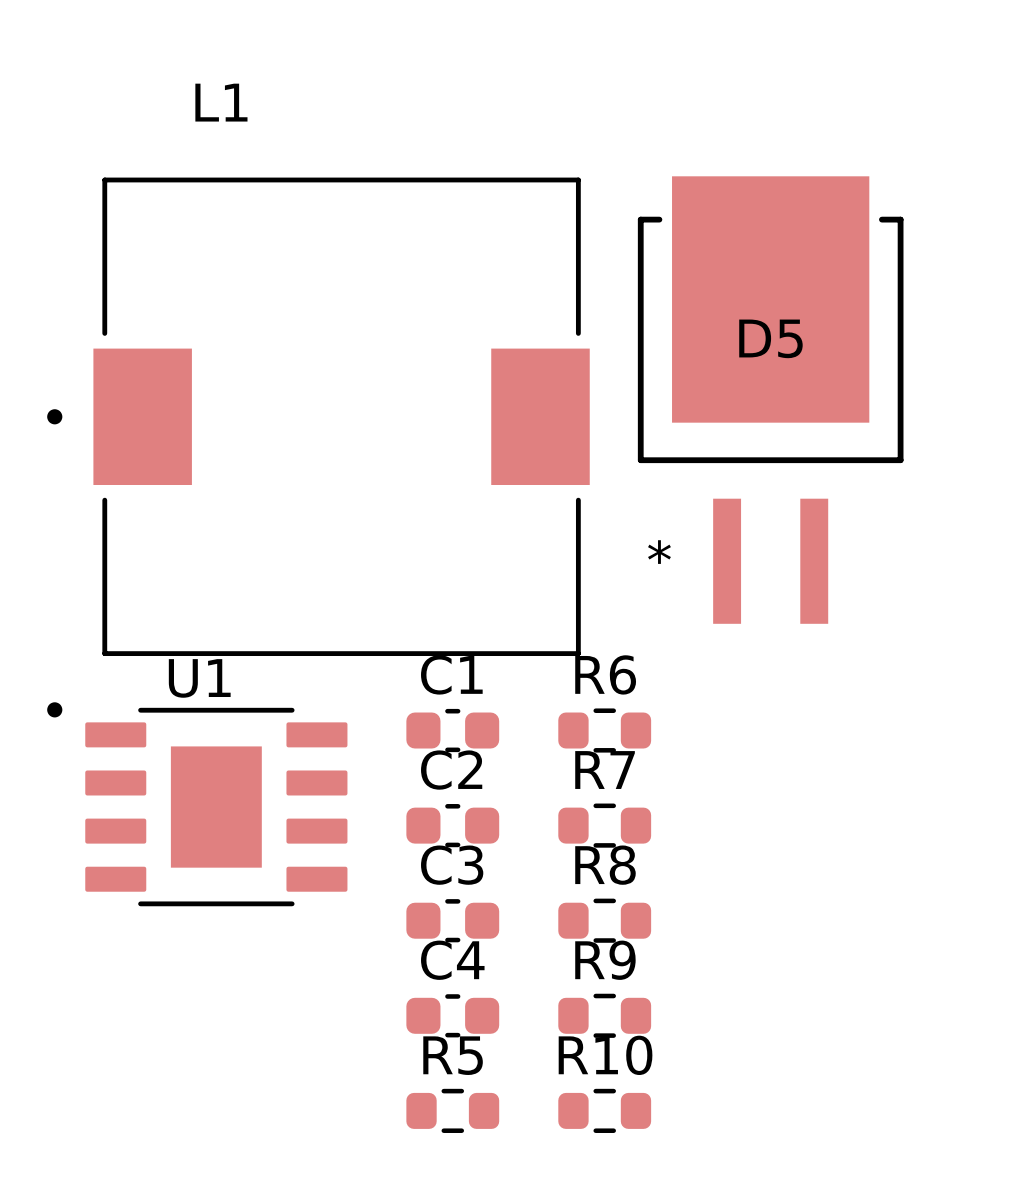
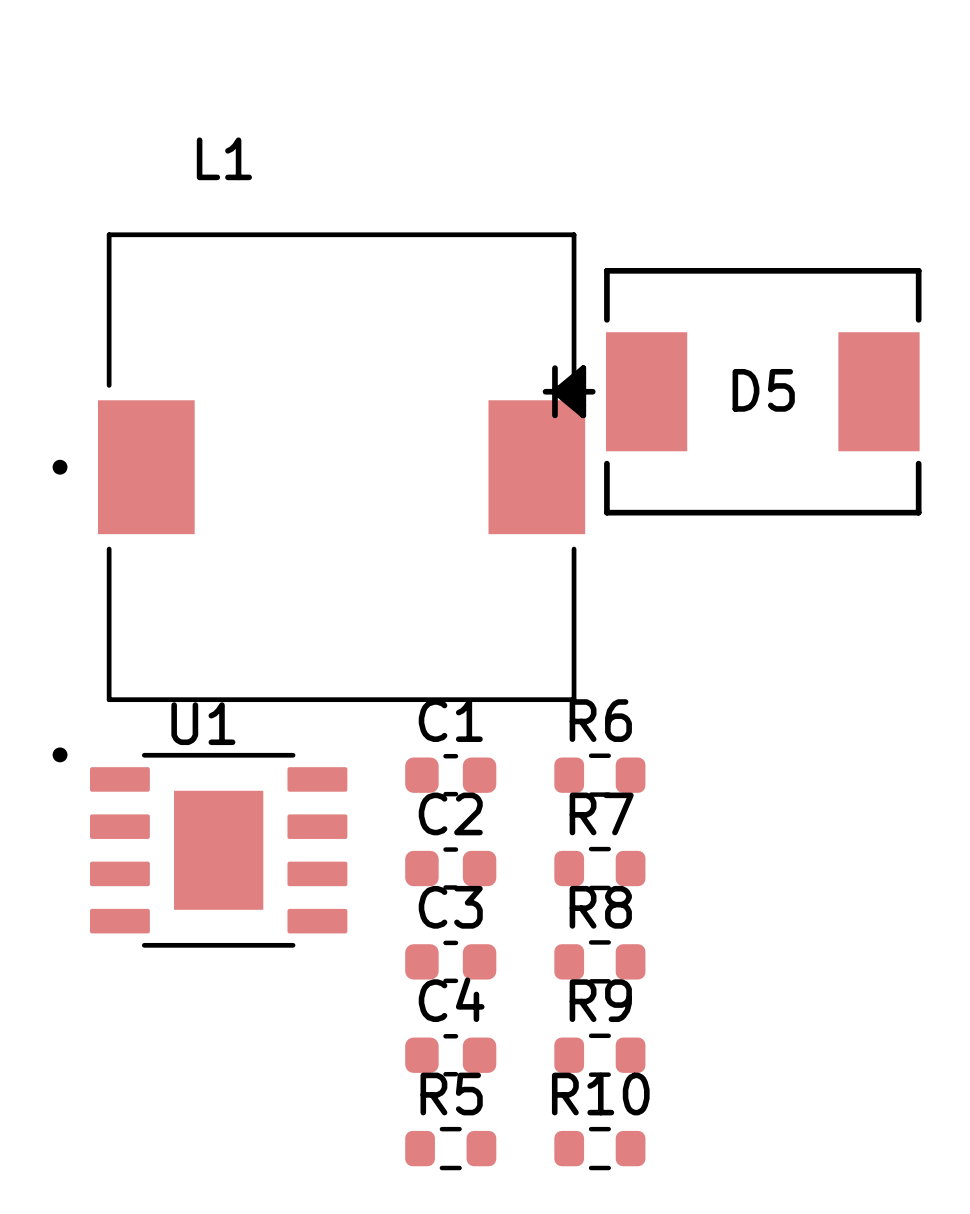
D5 footprint: [637, 176, 904, 624] -> [542, 267, 922, 516]

